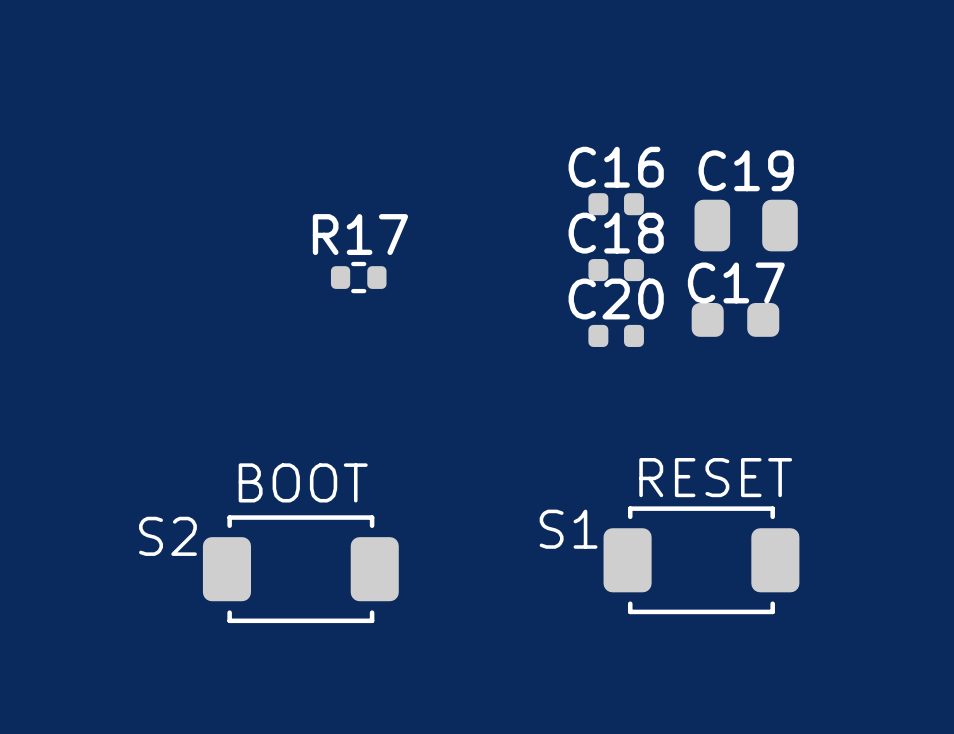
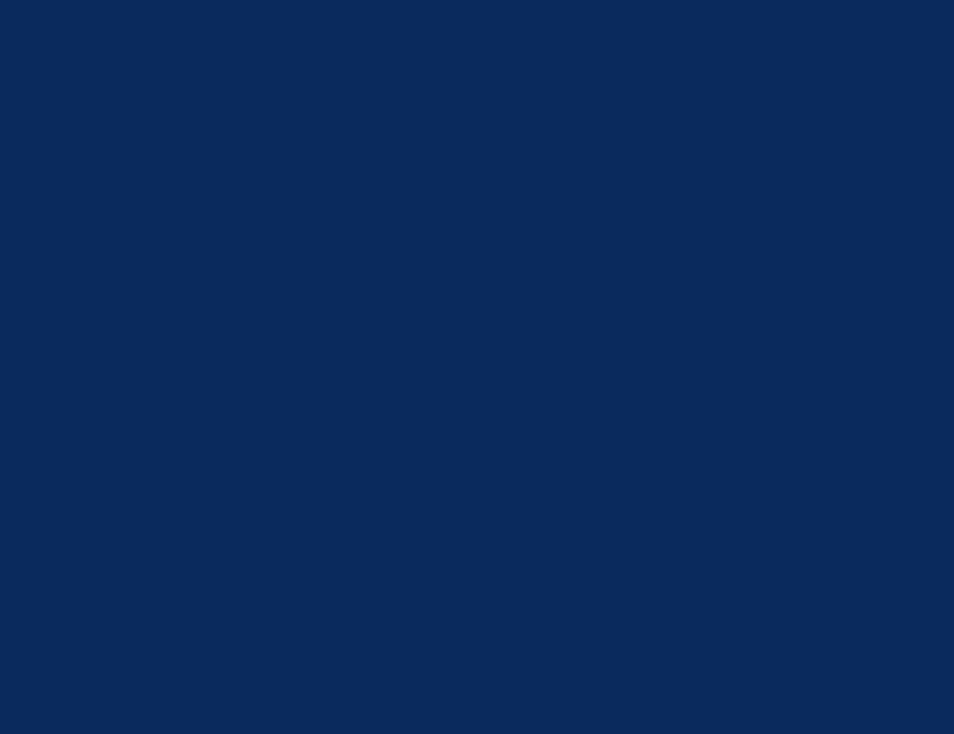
C16: (616, 204) -> none
C19: (746, 225) -> none
C18: (616, 270) -> none
R17: (358, 277) -> none
C17: (735, 319) -> none
C20: (616, 335) -> none
part: (701, 560) -> none
part: (300, 569) -> none

